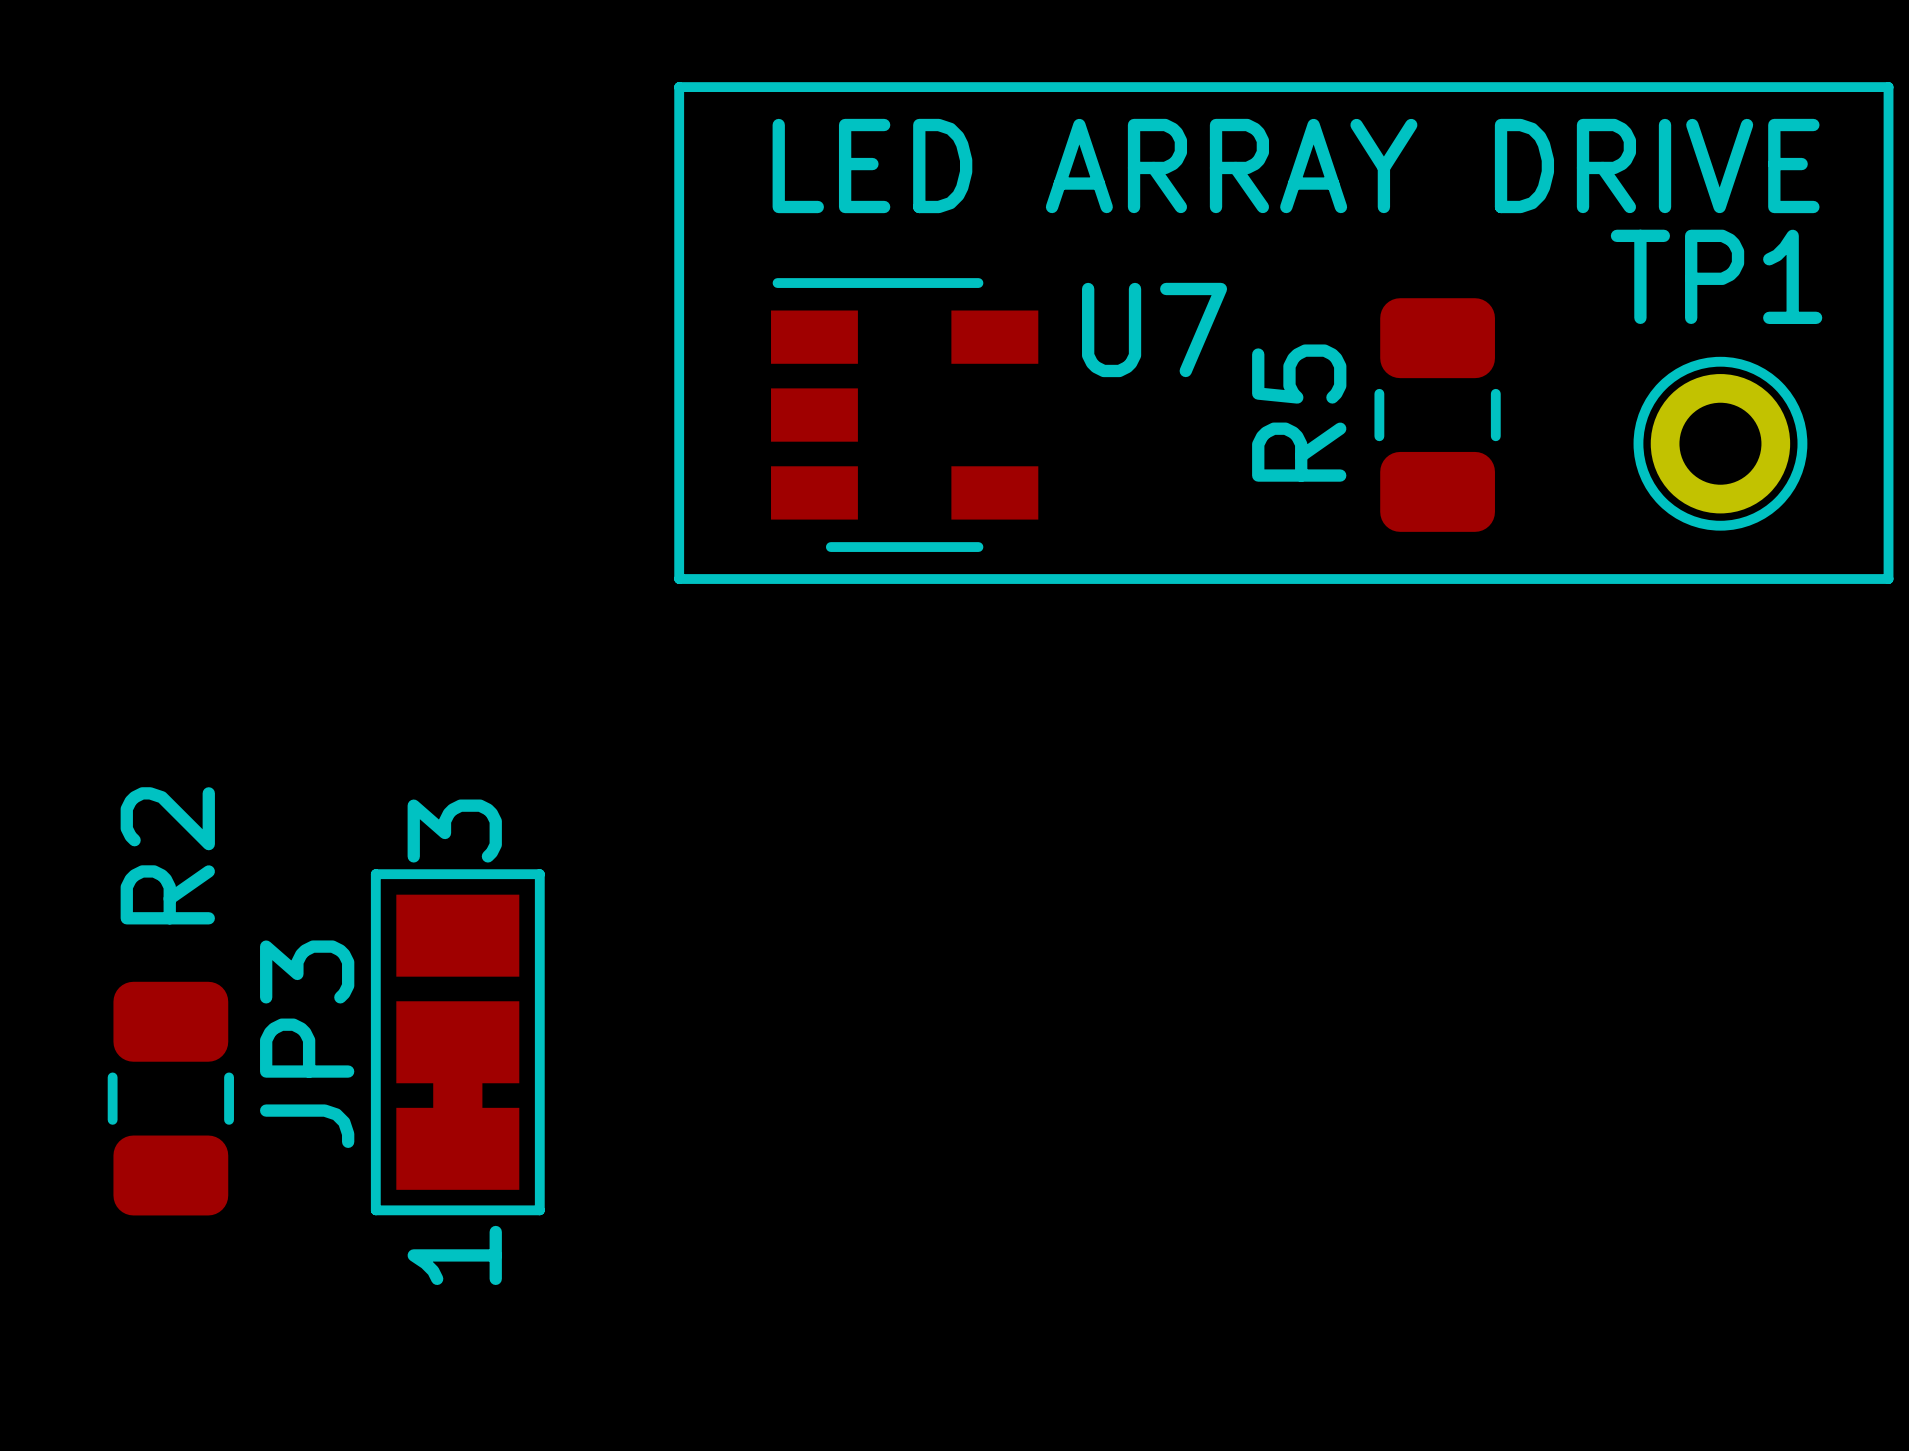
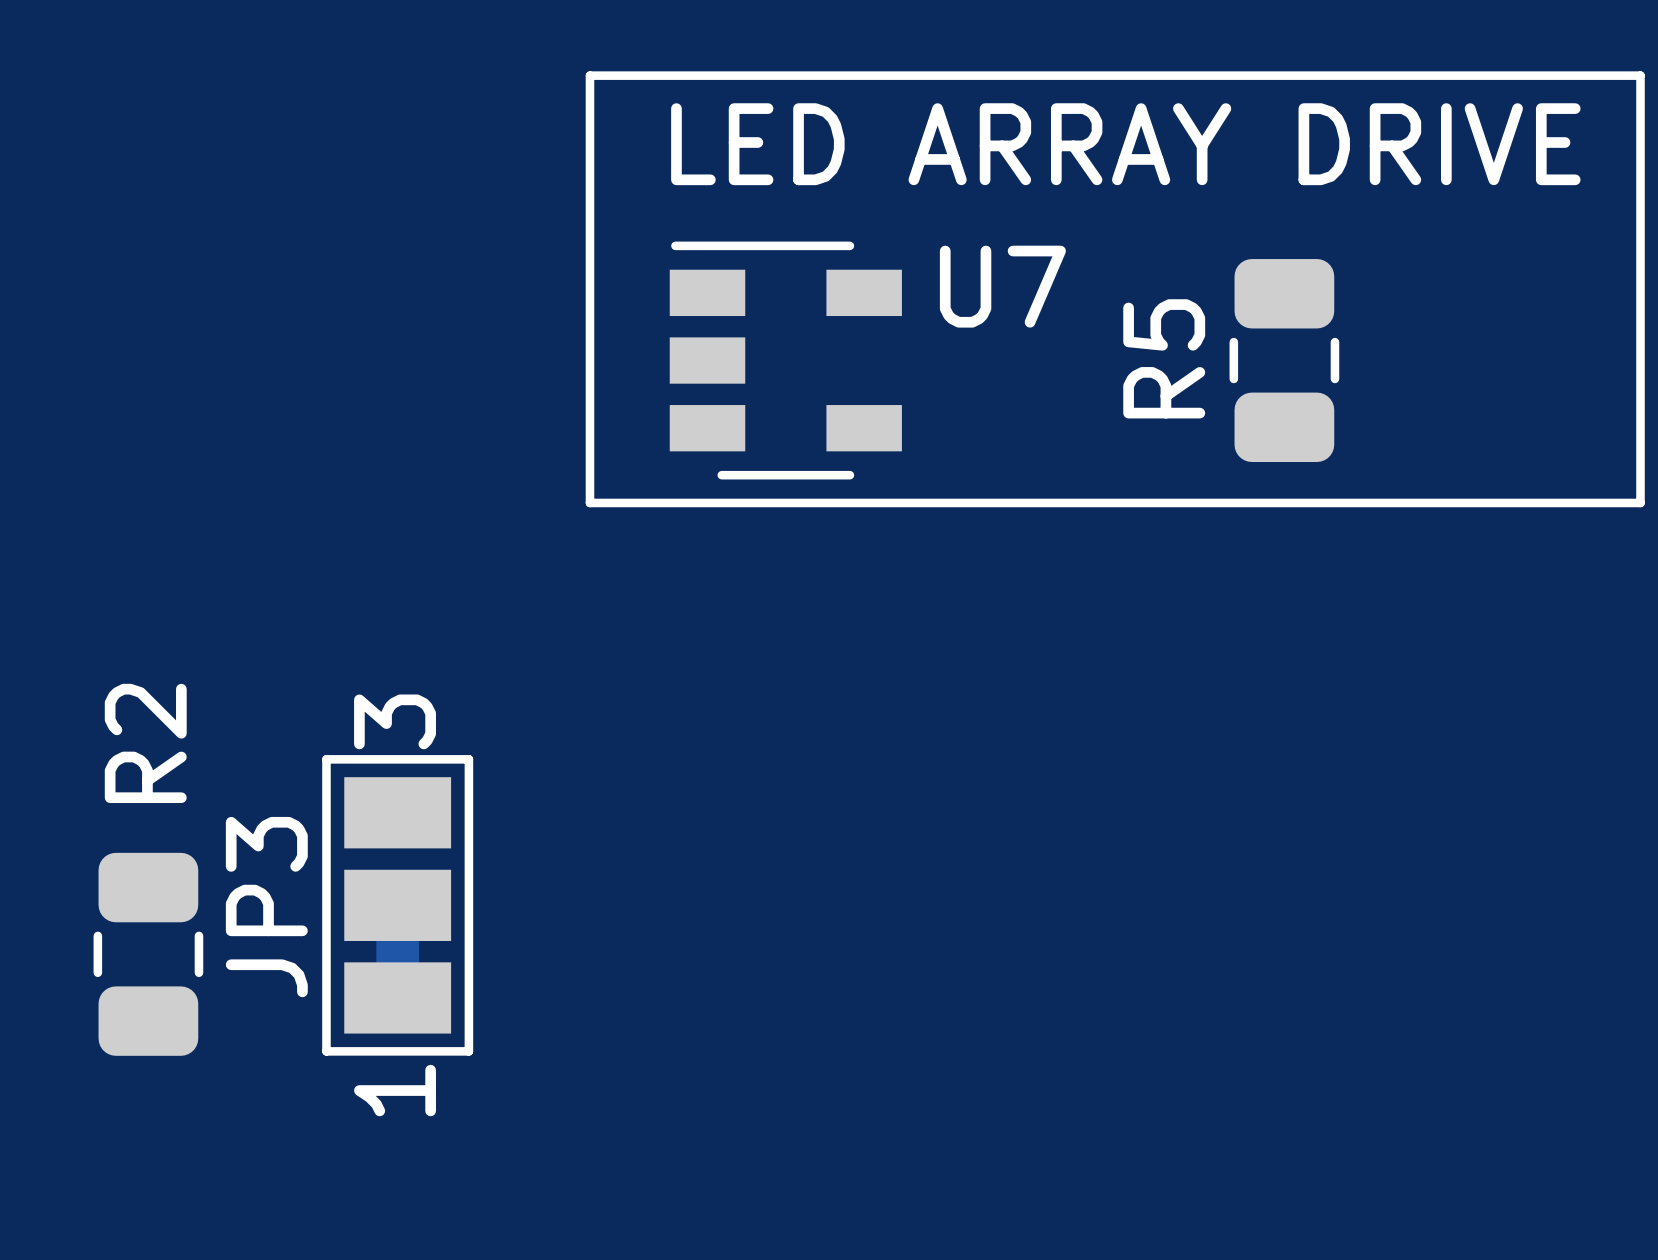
R5 position: (1437, 415) -> (1284, 360)
TP1: (1720, 443) -> none

